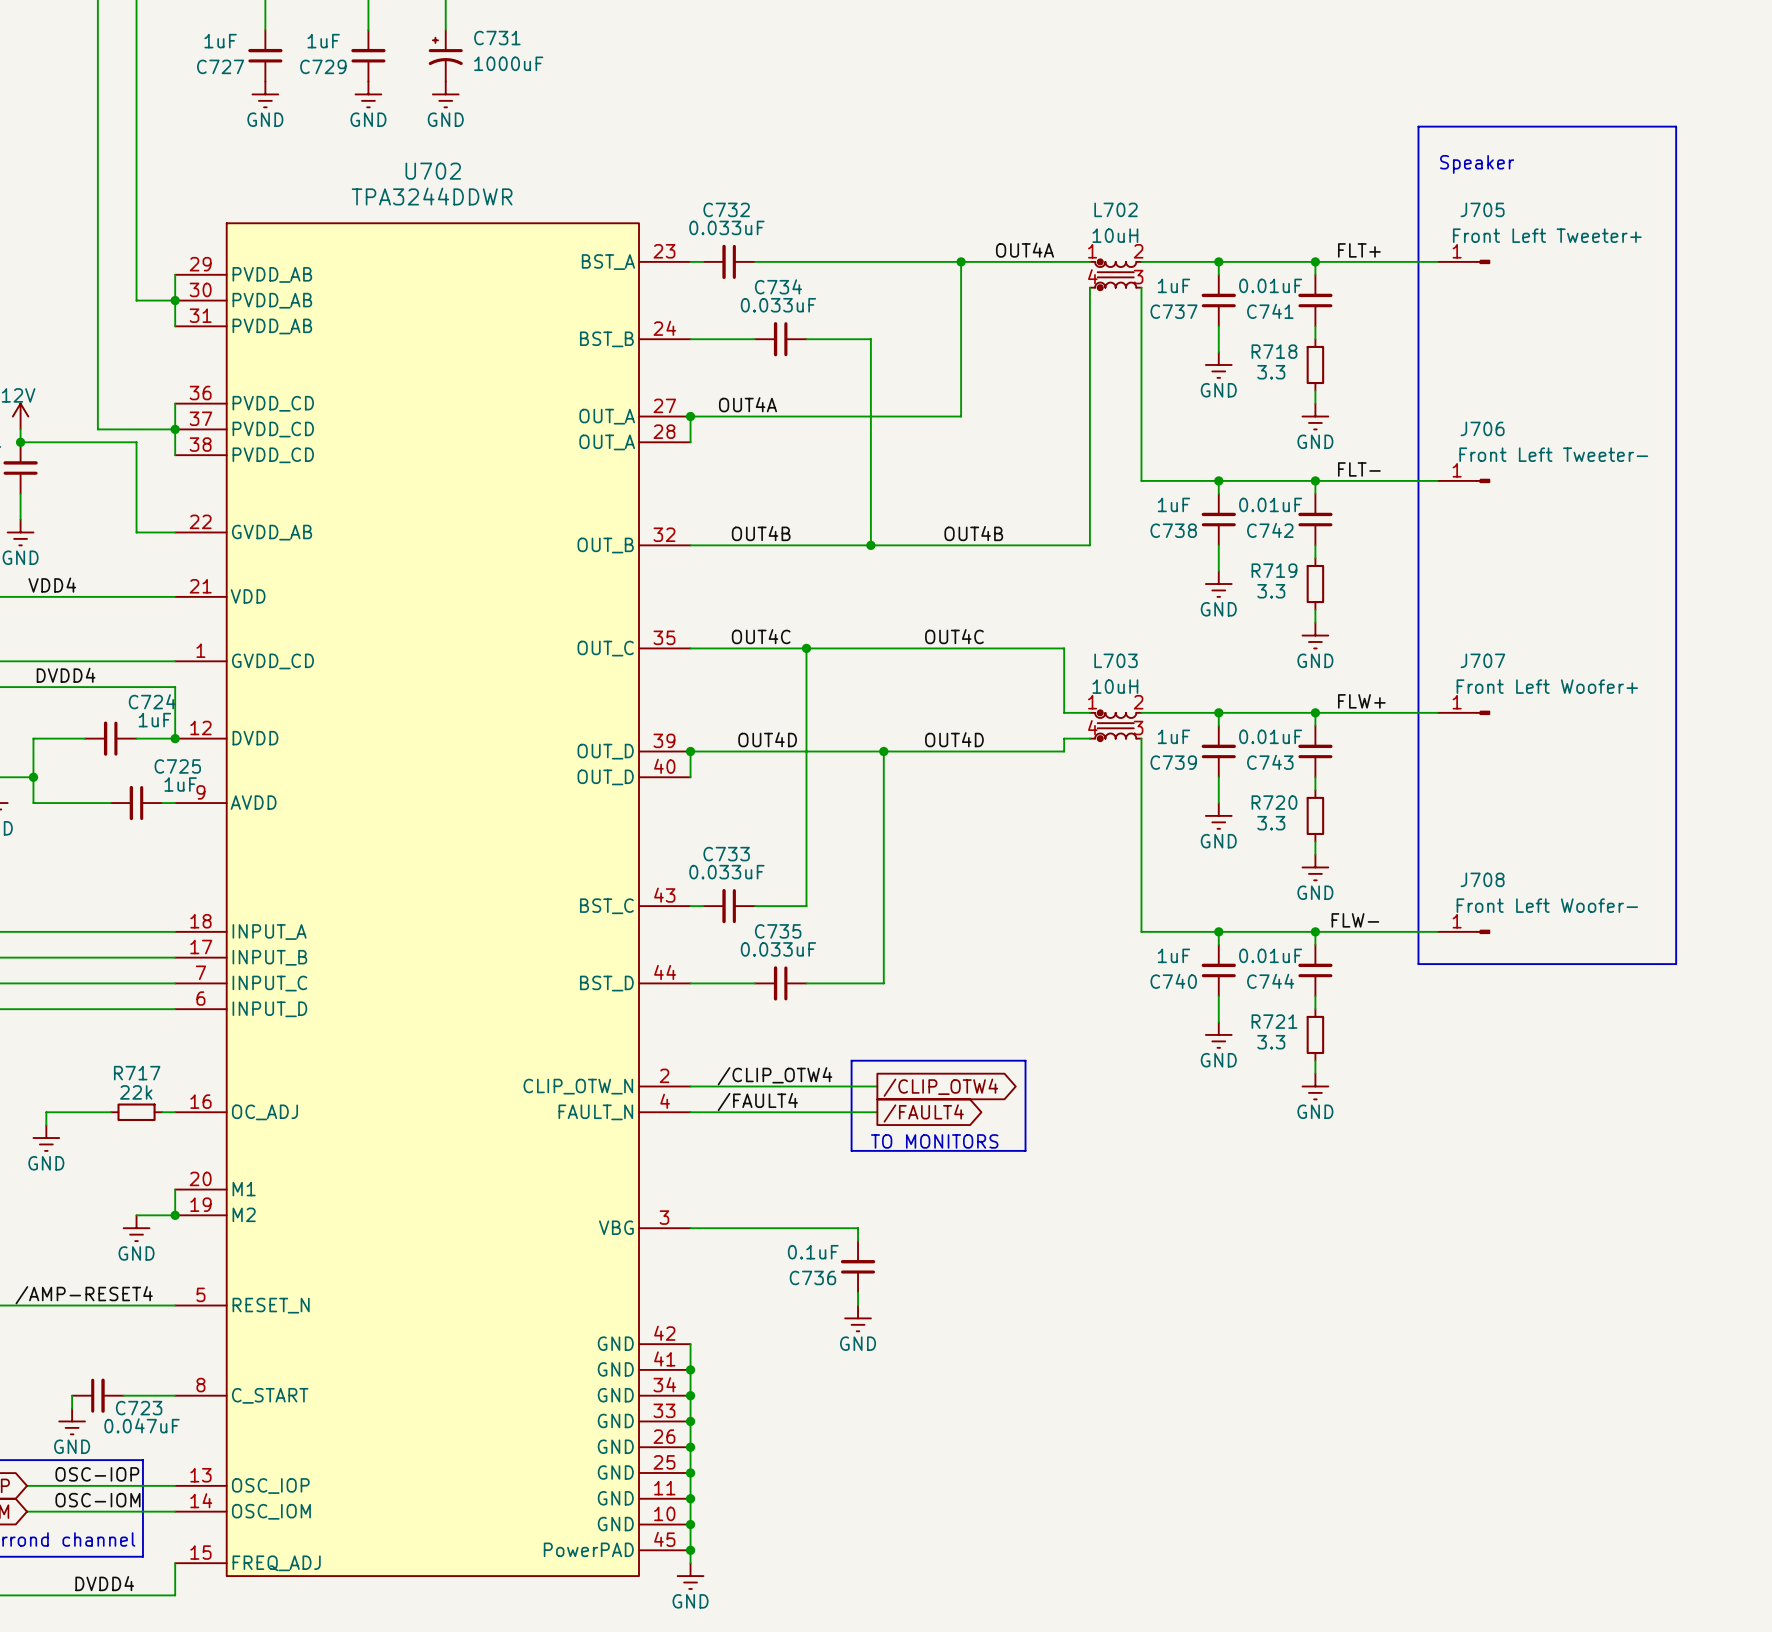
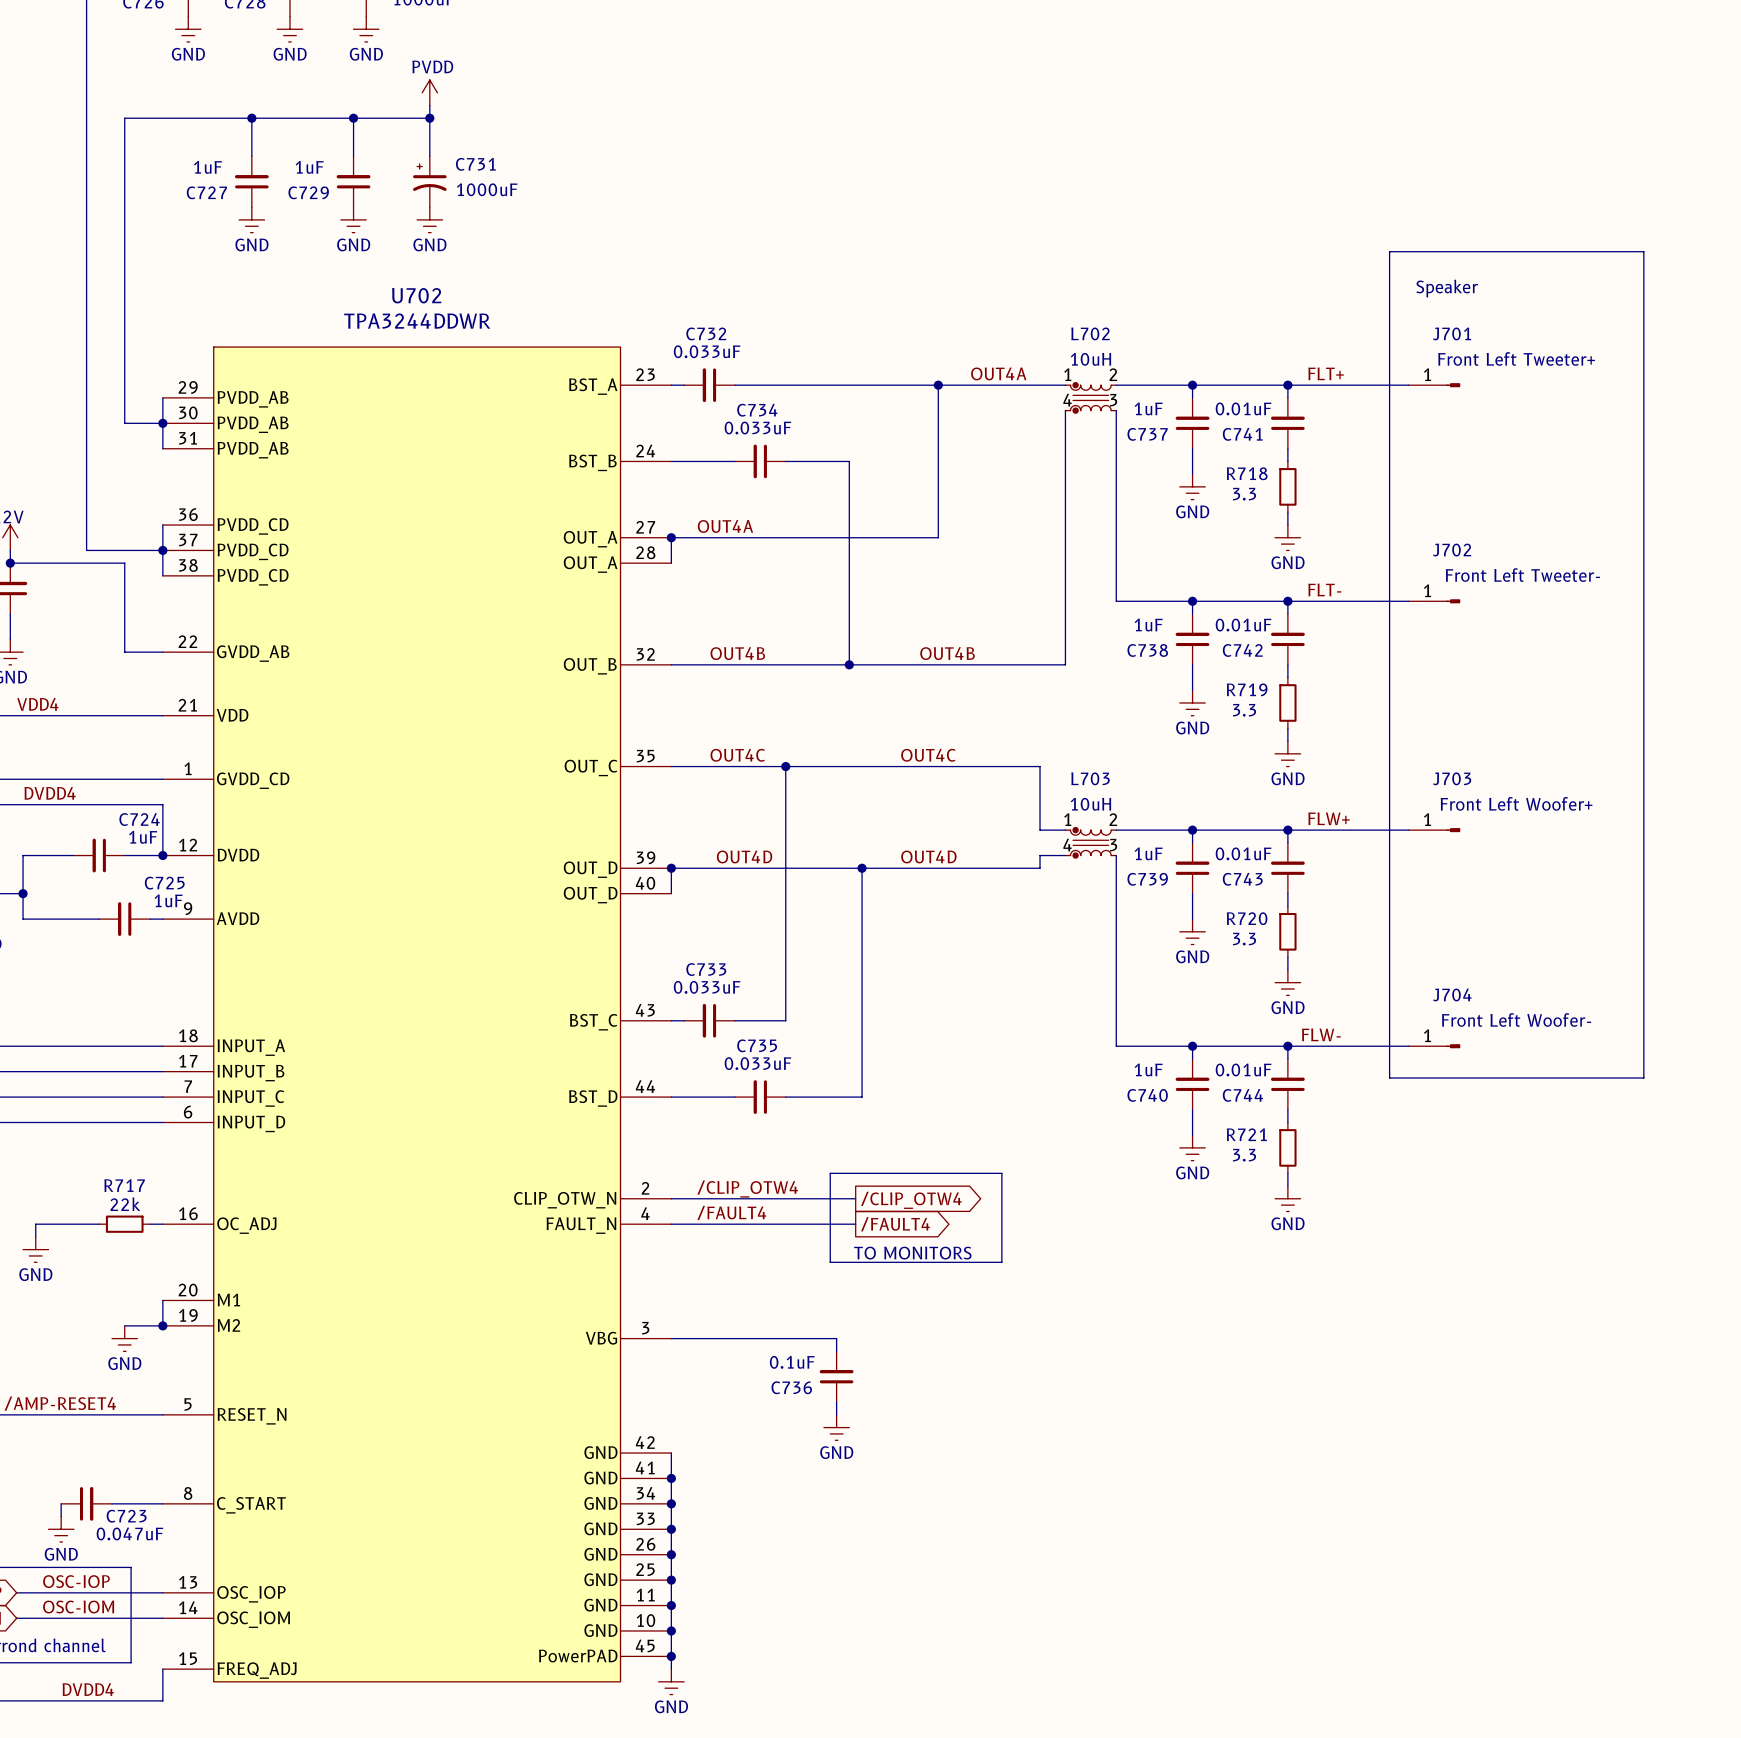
J705 name: J705 (1482, 209) -> J701 (1452, 333)
J706 name: J706 (1482, 428) -> J702 (1452, 550)
J707 name: J707 (1482, 660) -> J703 (1452, 778)
J708 name: J708 (1482, 879) -> J704 (1452, 994)

